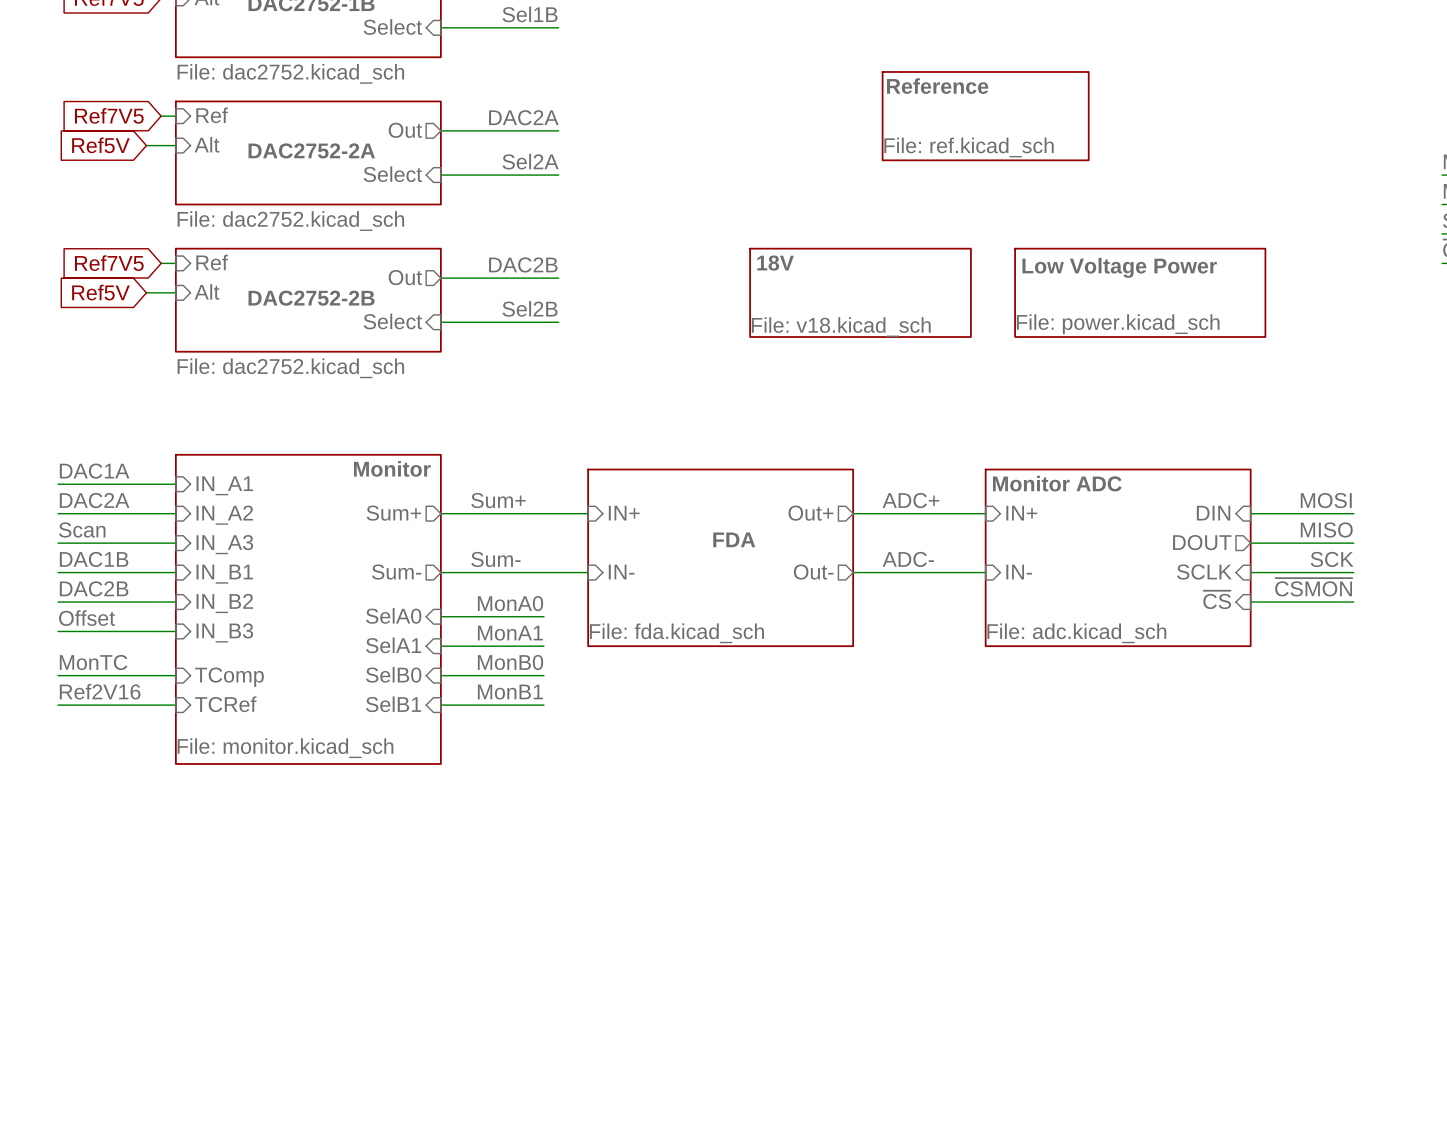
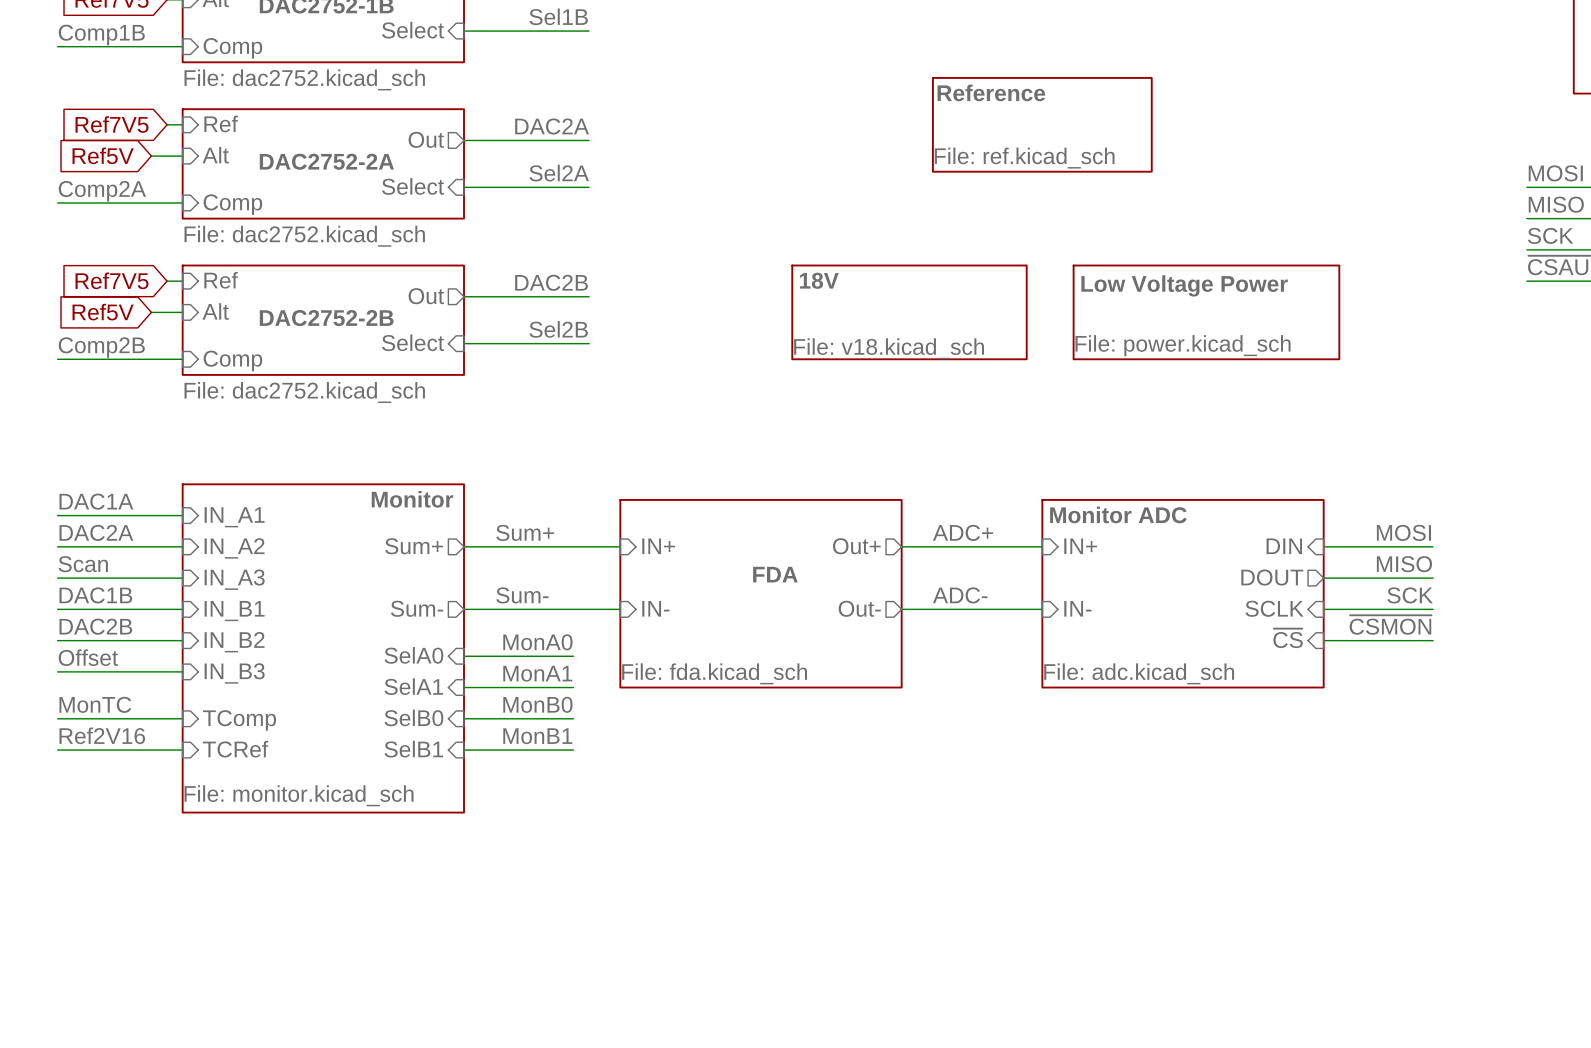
label: none -> Comp1B (101, 34)
wire: none -> (57, 46) (182, 46)
sheet pin: none -> Comp (232, 48)
label: none -> Comp2A (102, 191)
wire: none -> (57, 202) (182, 202)
sheet pin: none -> Comp (232, 204)
label: none -> Comp2B (101, 347)
wire: none -> (57, 359) (182, 359)
sheet pin: none -> Comp (232, 360)

